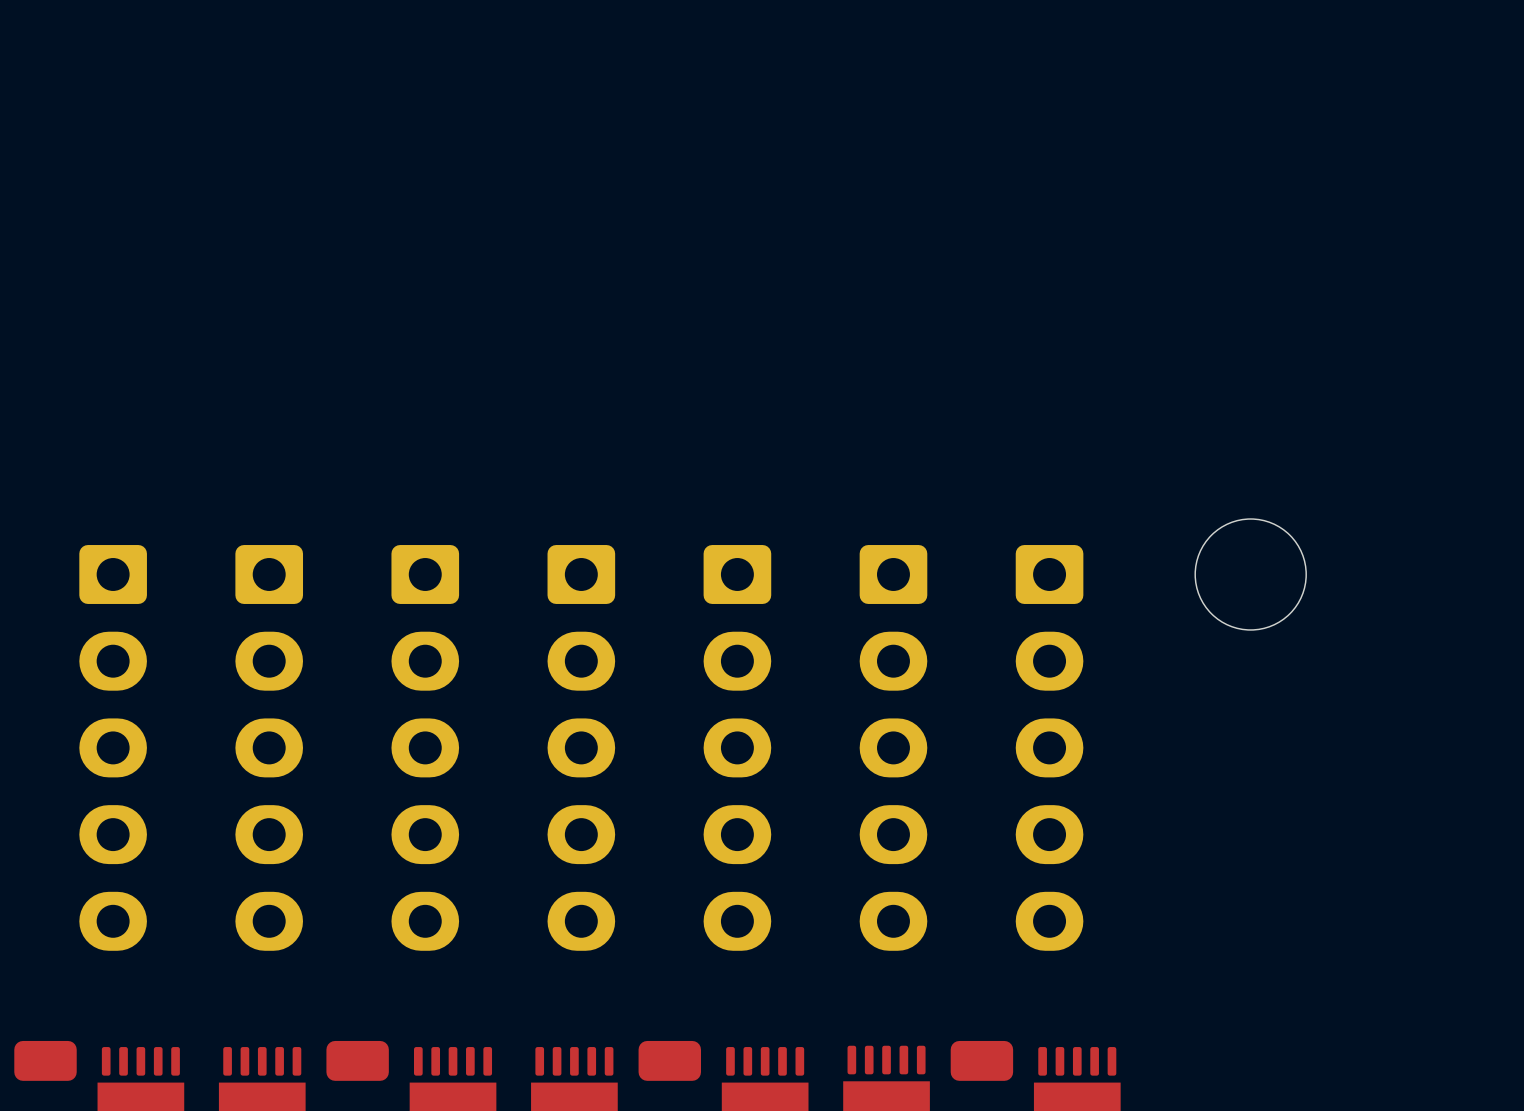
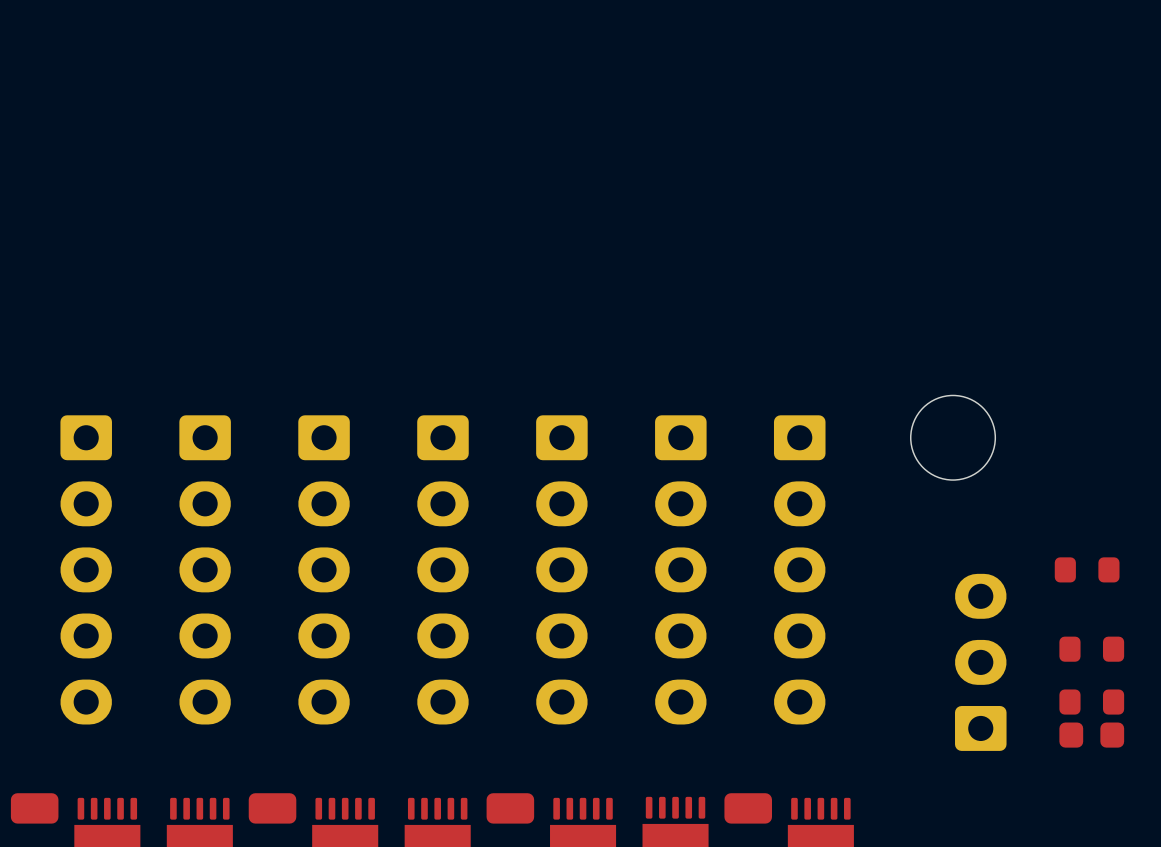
part: none -> (1087, 569)
part: none -> (1091, 649)
part: none -> (980, 662)
part: none -> (1091, 702)
part: none -> (1091, 735)

